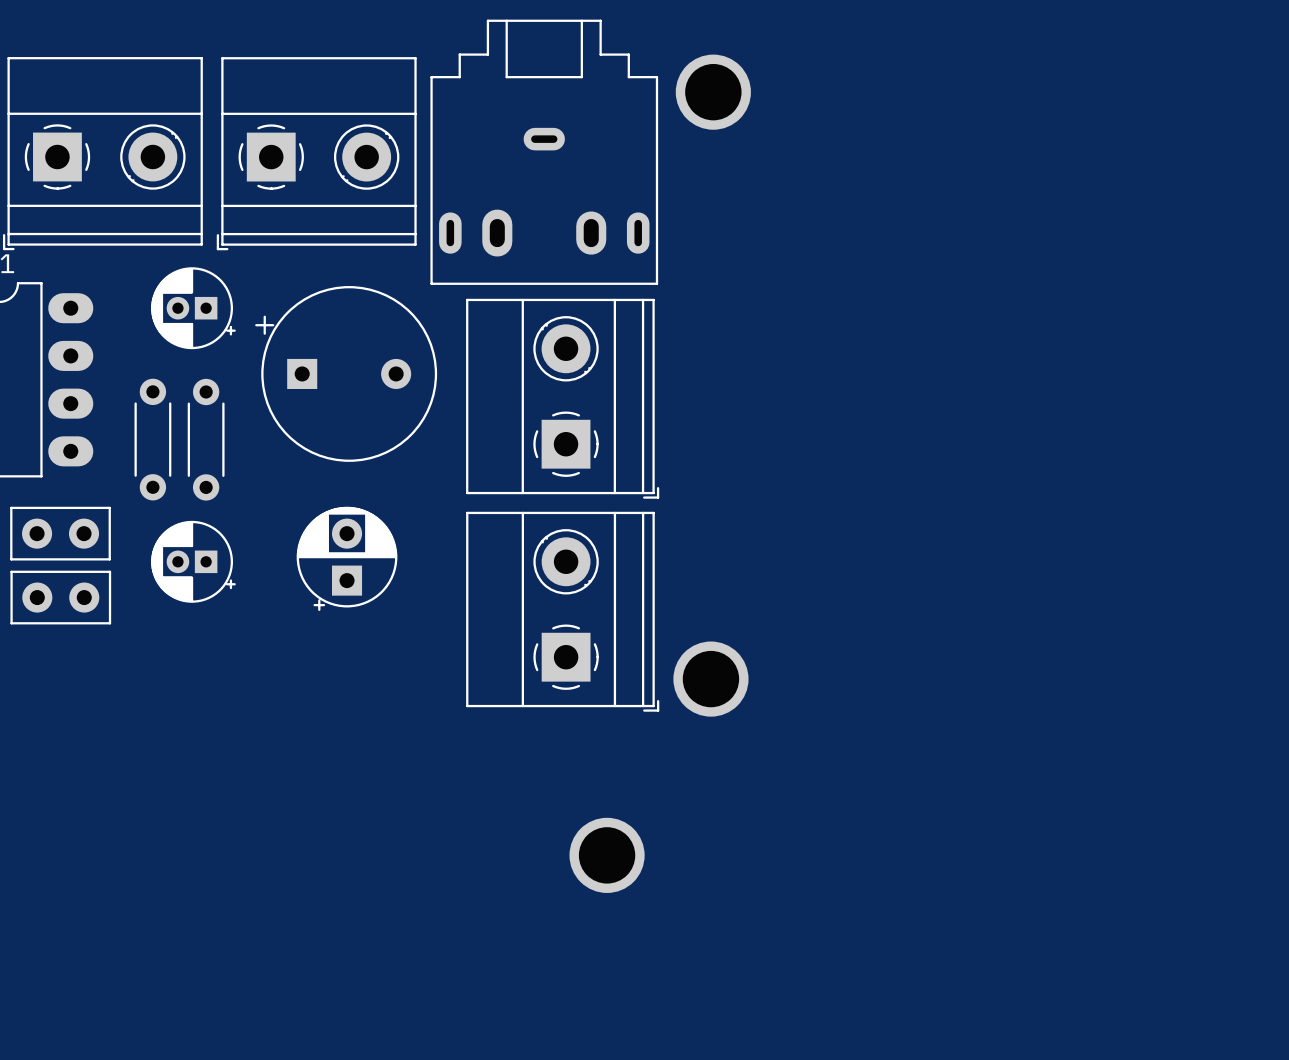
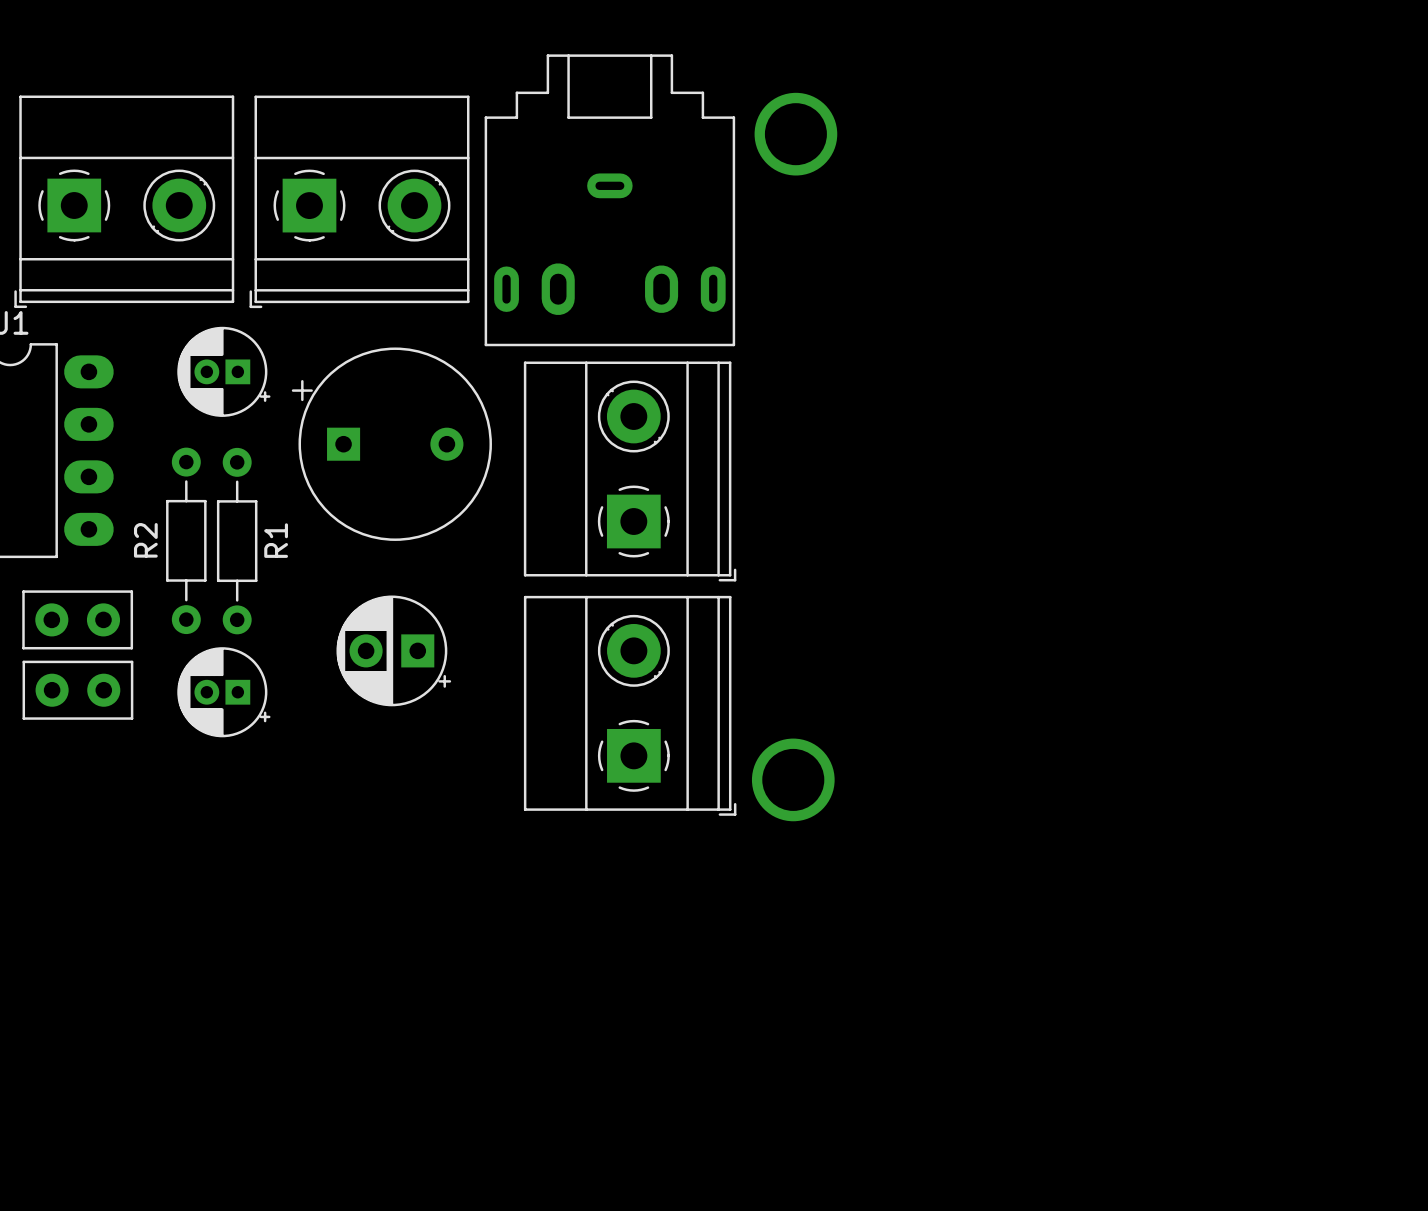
part: (152, 439) -> none
part: (206, 439) -> none
R2: none -> (186, 540)
R1: none -> (237, 541)
part rotation: 0° (347, 558) -> 90° counterclockwise (393, 650)
part position: (193, 561) -> (223, 692)
part: (607, 855) -> none

